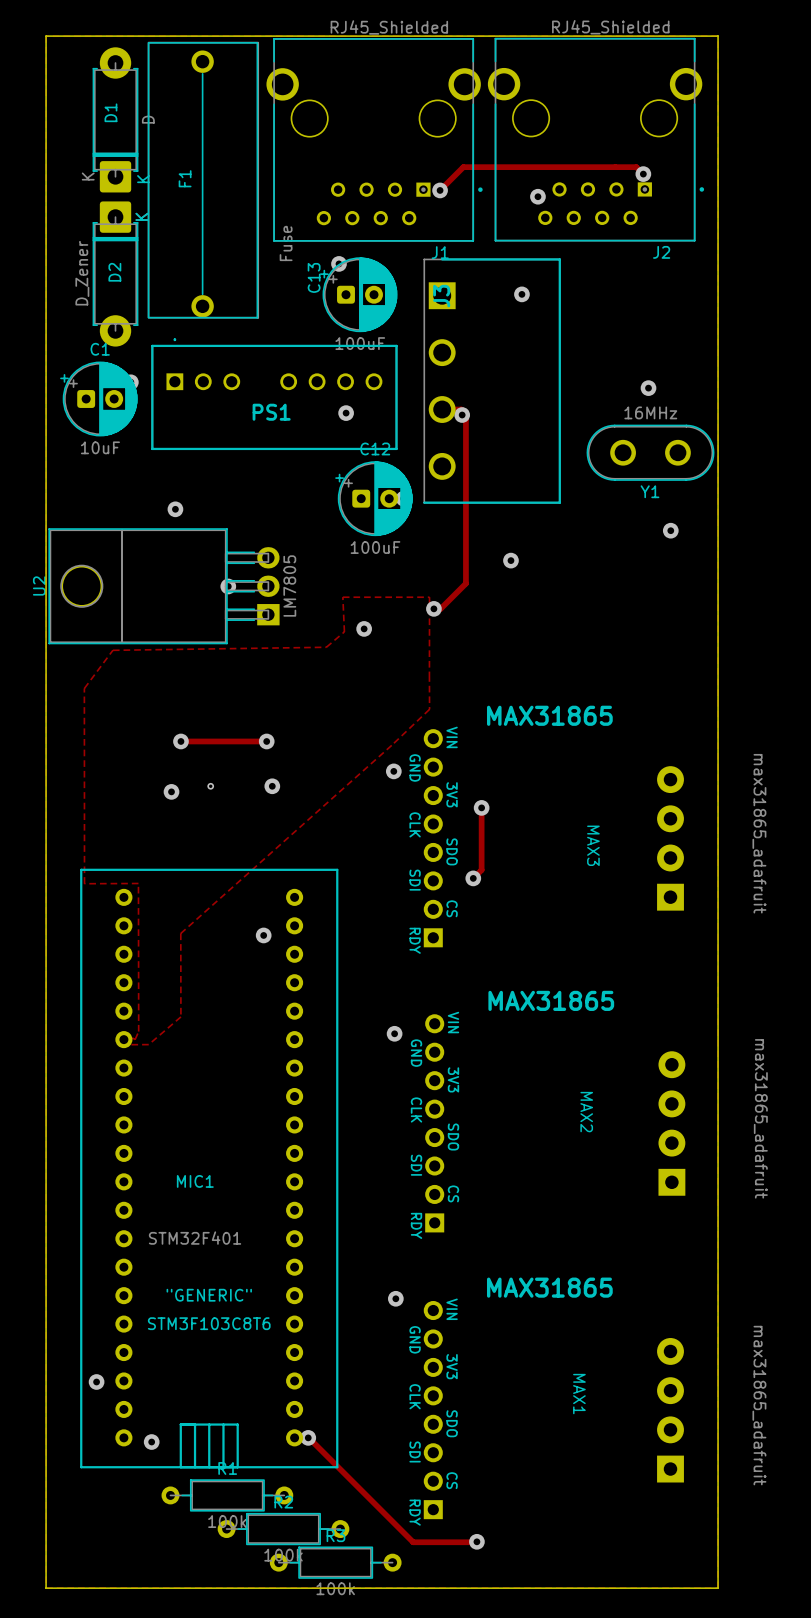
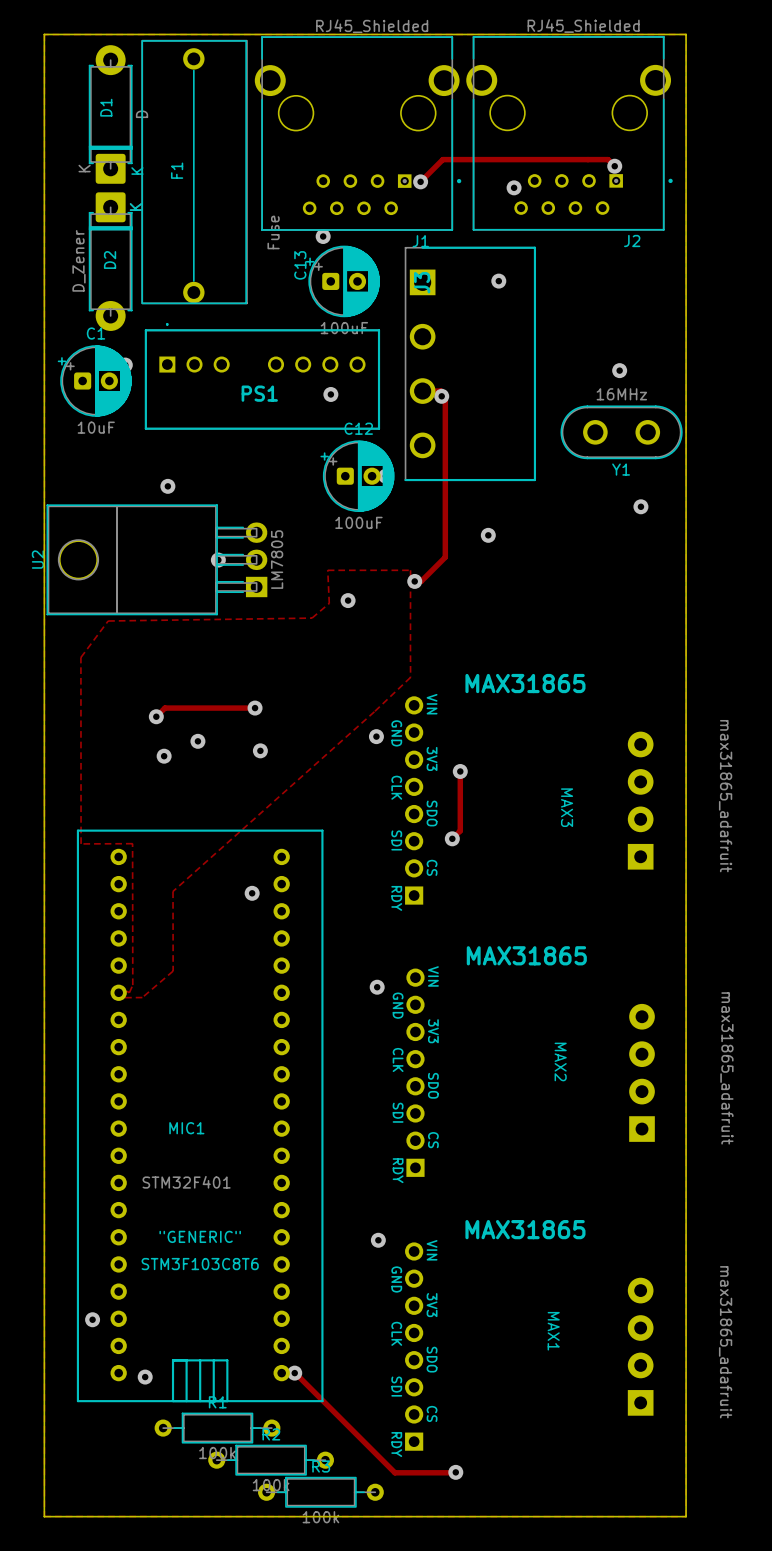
via position: (339, 263) -> (323, 236)
track: none -> (173, 708) (164, 708) (156, 716)
via position: (180, 741) -> (156, 716)
via size: [207, 782, 215, 790] -> [190, 733, 206, 749]

